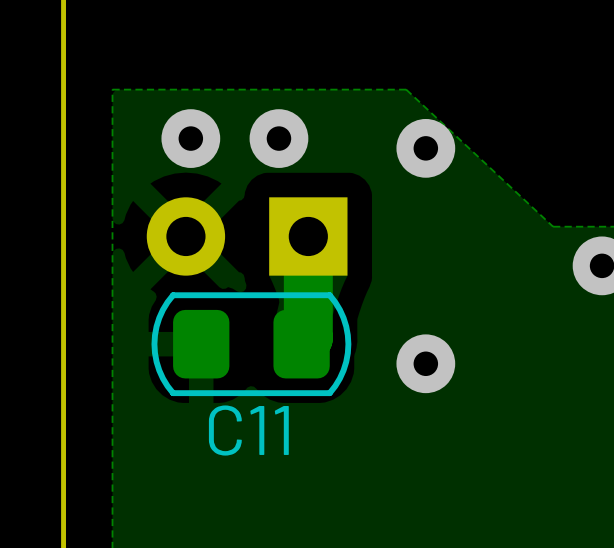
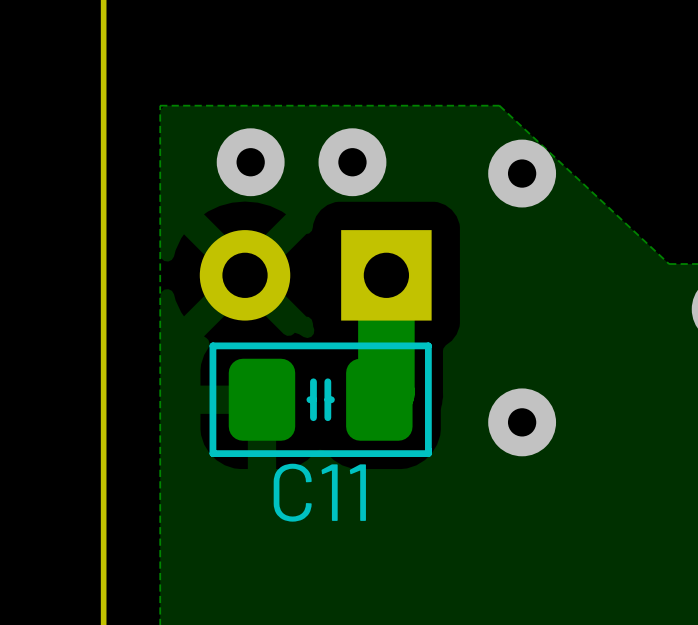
C11 footprint: [151, 292, 352, 397] -> [209, 342, 432, 458]

